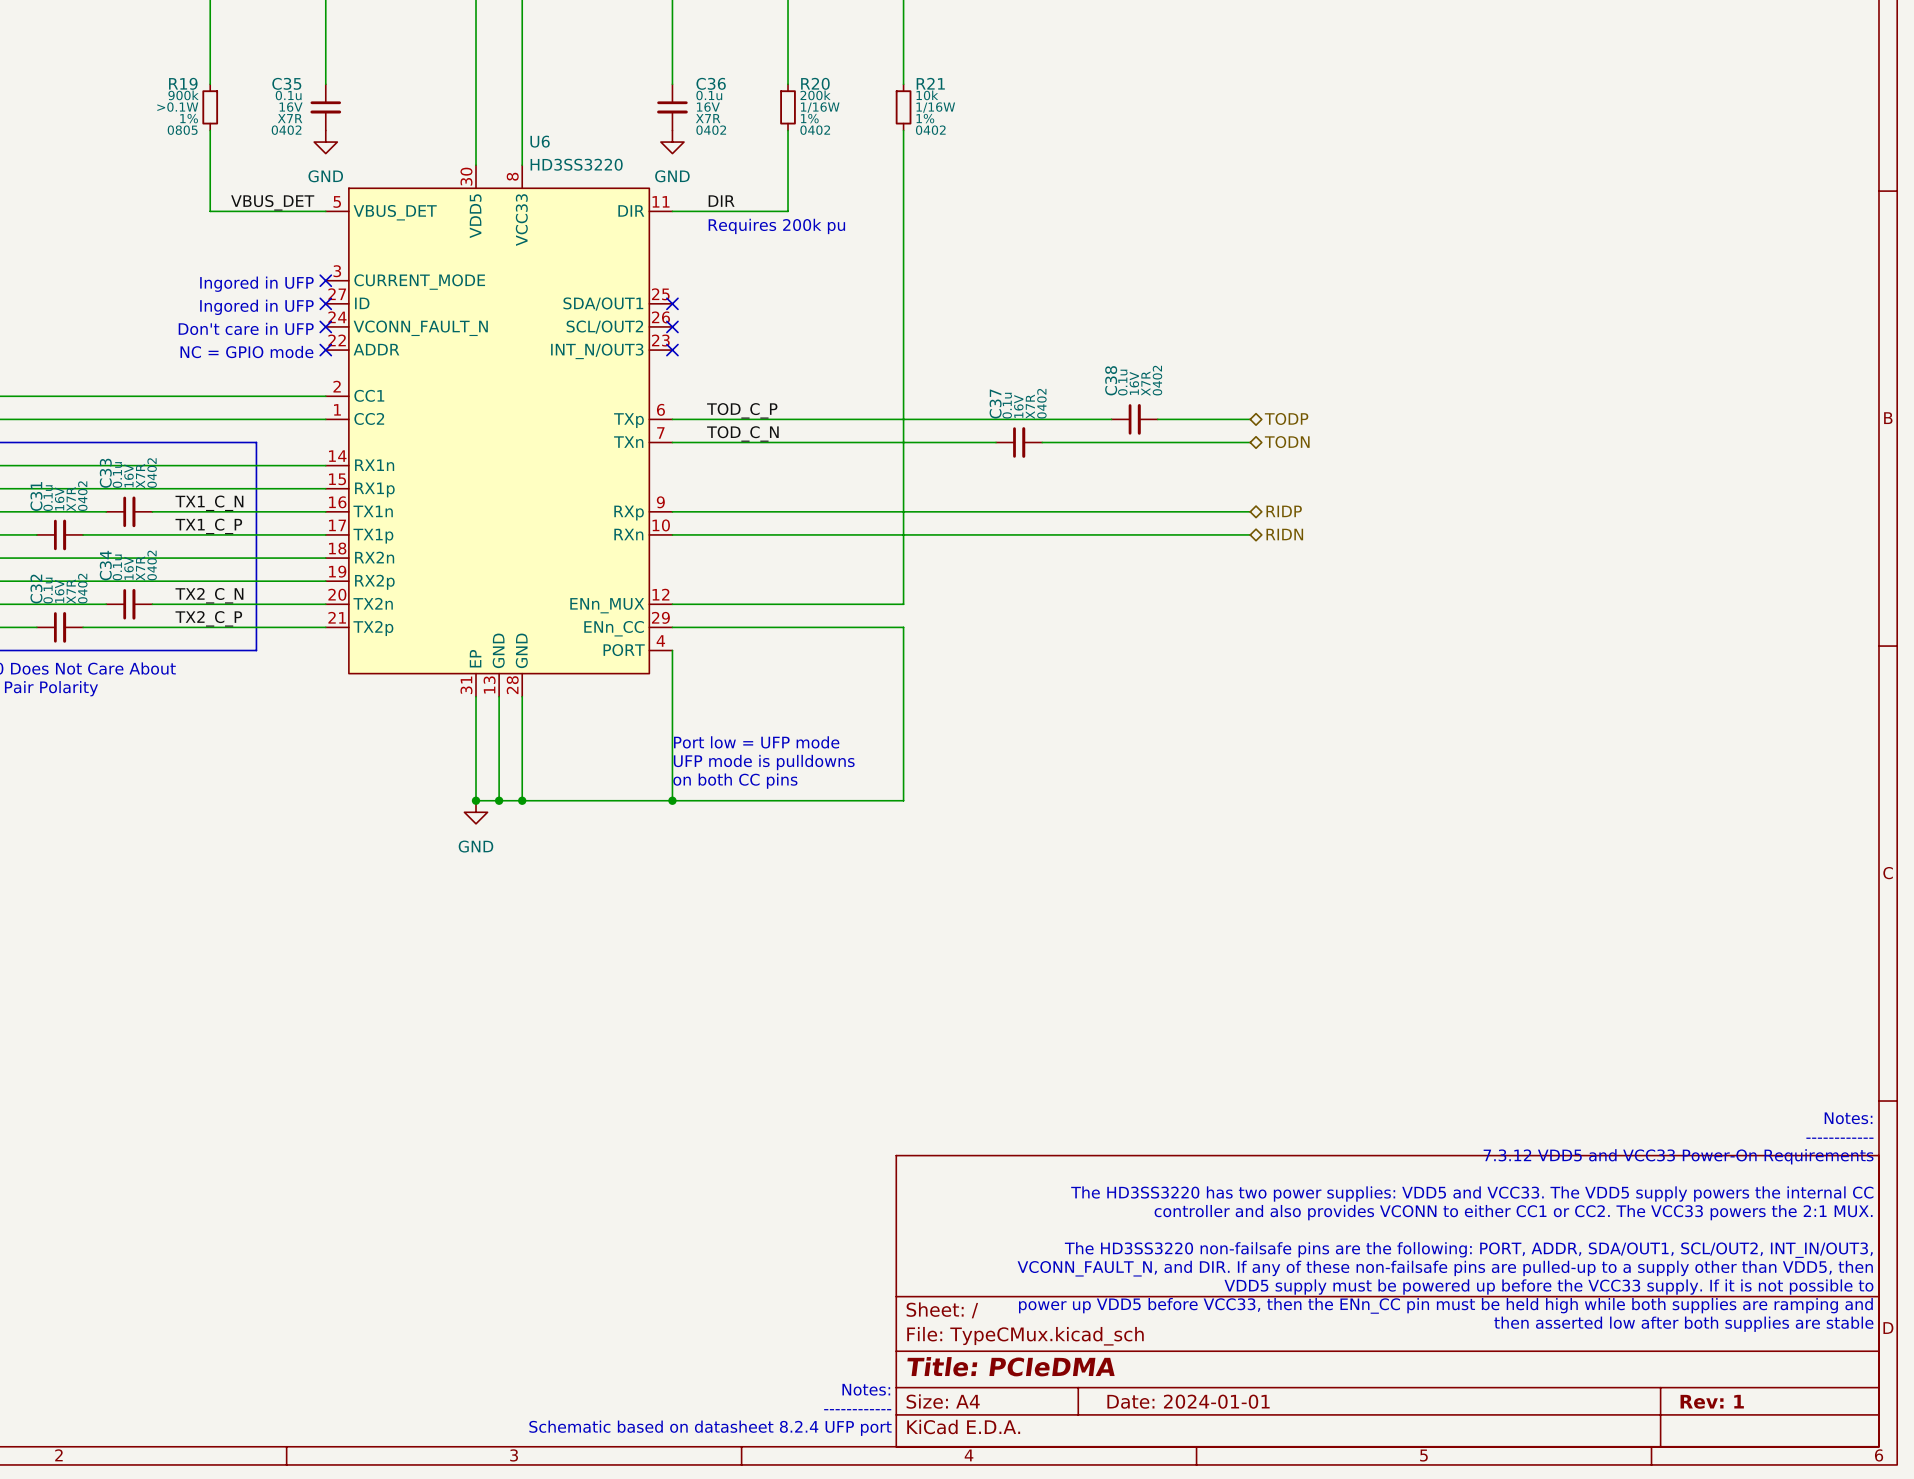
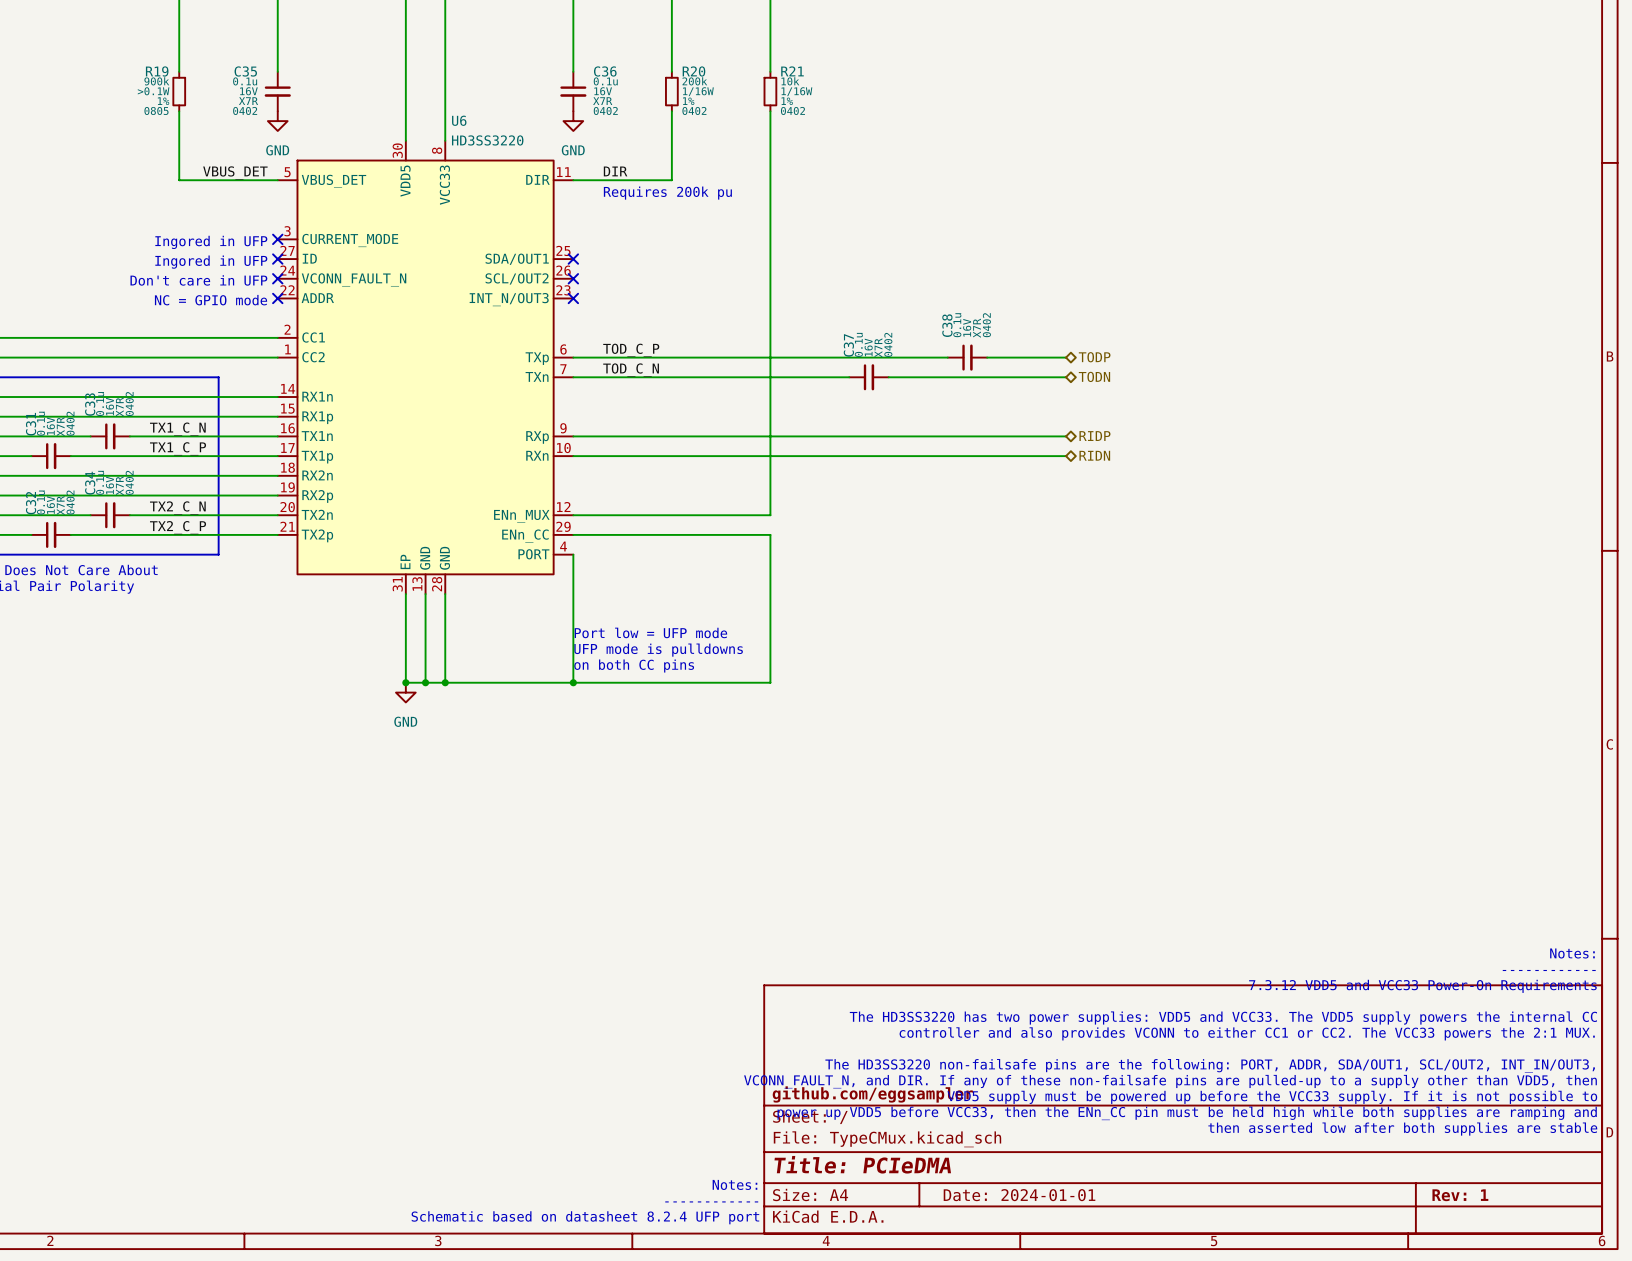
title block: none -> github.com/eggsampler (872, 1094)

